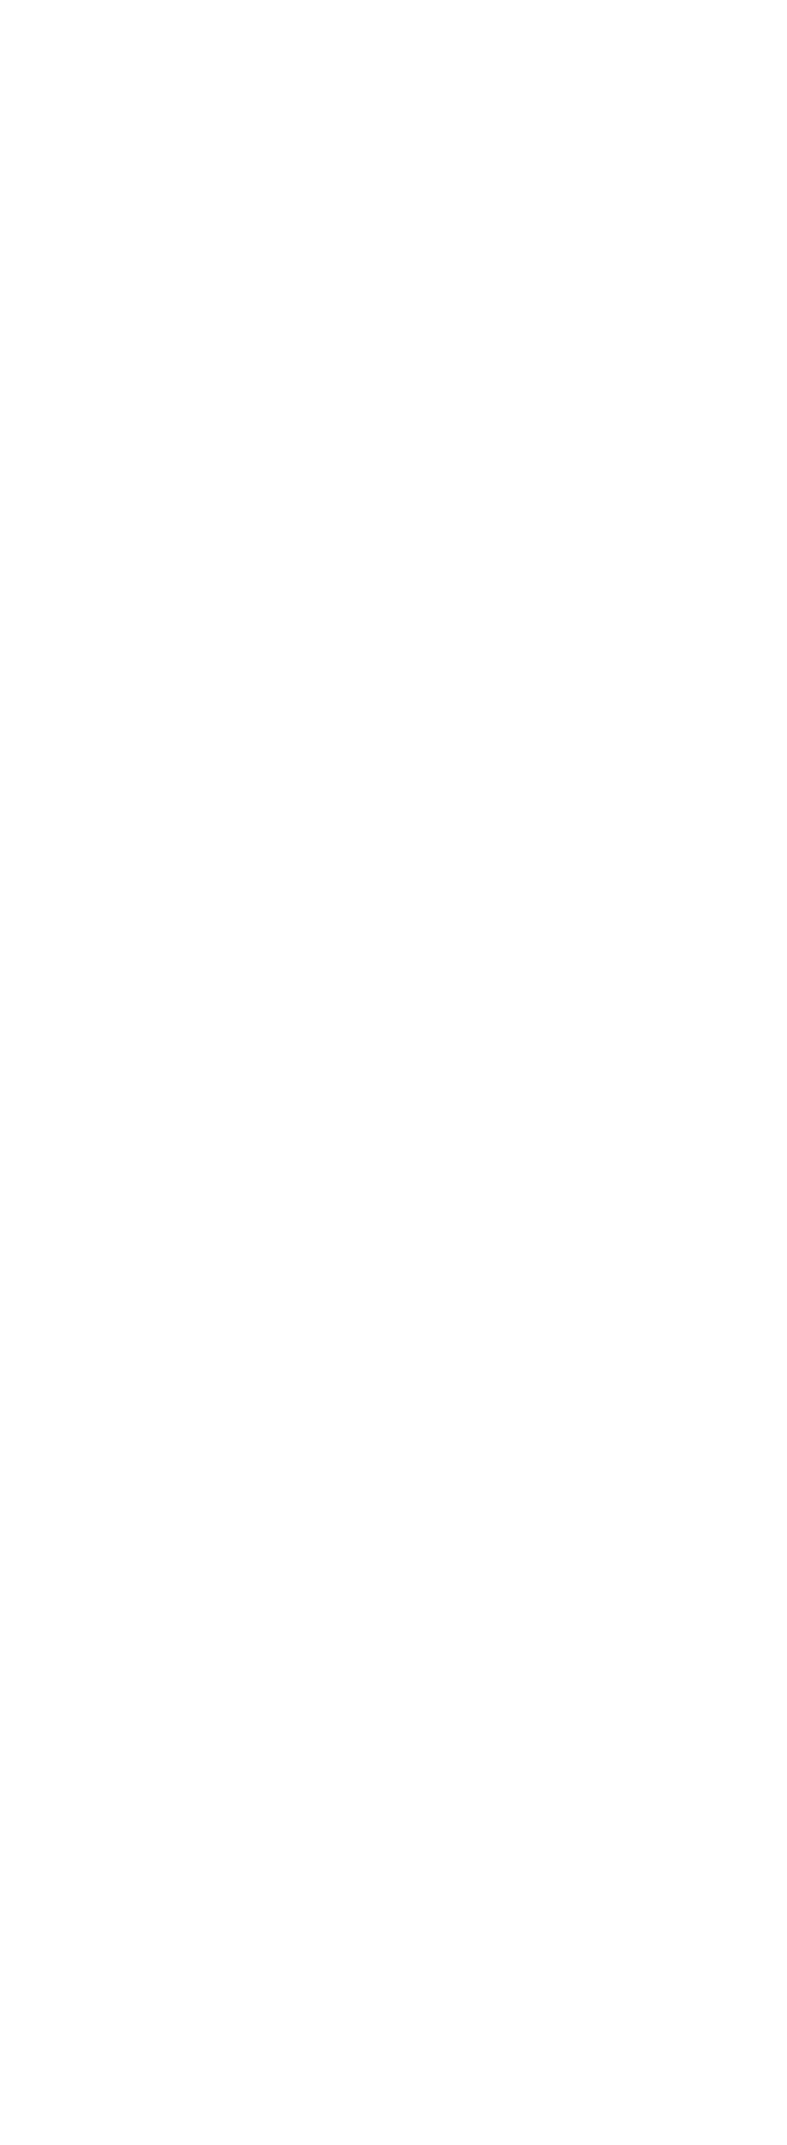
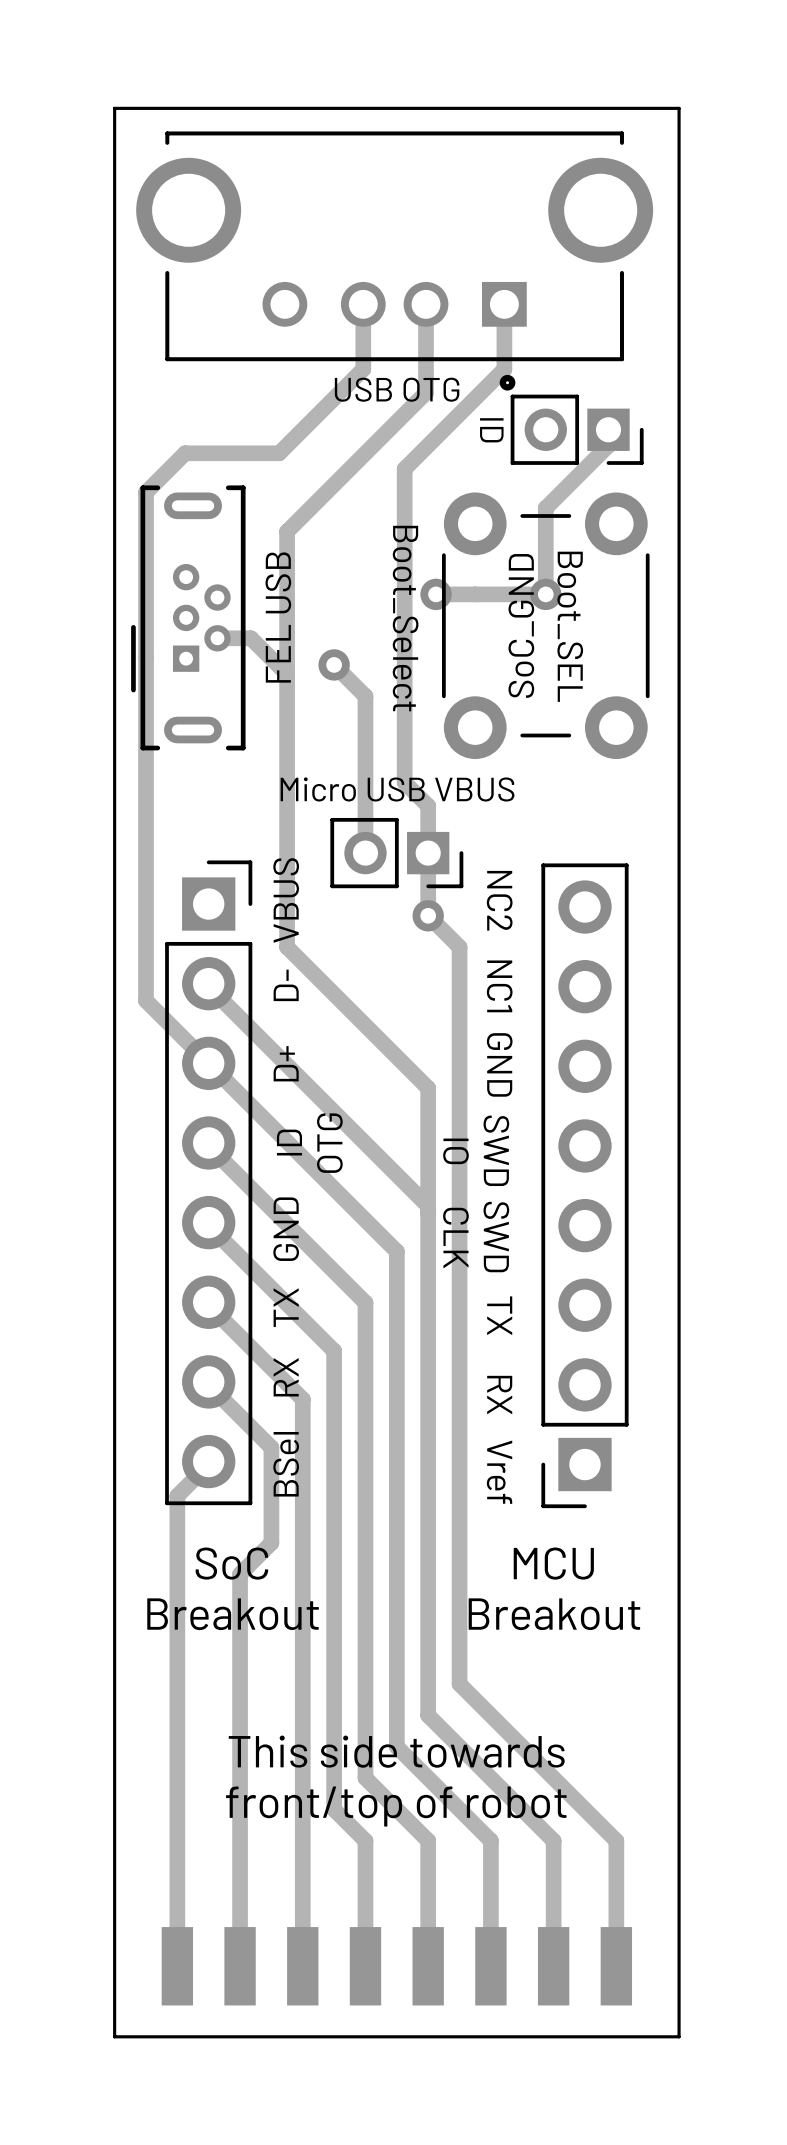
board edge: none -> (114, 108) (679, 108) (679, 2036) (114, 2036) (114, 108)
part: none -> (394, 261)
track: none -> (363, 304) (363, 369) (279, 453) (185, 453) (145, 492) (145, 1000) (396, 1251) (396, 1746) (490, 1840) (490, 1966)
track: none -> (426, 304) (426, 392) (287, 531) (287, 947) (428, 1088) (428, 1715) (553, 1840) (553, 1966)
track: none -> (504, 304) (504, 369) (404, 468) (404, 782) (428, 806) (428, 915) (459, 947) (459, 1684) (616, 1840) (616, 1966)
text: none -> USB OTG (397, 389)
part: none -> (577, 429)
track: none -> (608, 429) (608, 445) (545, 508) (545, 594) (436, 594)
text: none -> ID (491, 430)
via: none -> (436, 594)
via: none -> (545, 594)
part: none -> (188, 617)
text: none -> FEL USB (278, 617)
text: none -> Boot_Select (405, 618)
text: none -> SoC_GND (521, 625)
part: none -> (545, 625)
text: none -> Boot_SEL (570, 626)
track: none -> (217, 638) (251, 638) (287, 674)
track: none -> (334, 664) (365, 696) (365, 853)
via: none -> (334, 664)
text: none -> Micro USB VBUS (397, 789)
part: none -> (396, 853)
text: none -> VBUS (286, 900)
text: none -> NC2 (499, 900)
via: none -> (428, 915)
text: none -> D- (286, 985)
track: none -> (208, 986) (428, 1206)
text: none -> NC1 (499, 986)
text: none -> D+ (286, 1063)
text: none -> GND (499, 1064)
text: none -> ID (289, 1142)
text: none -> OTG (329, 1143)
track: none -> (208, 1145) (365, 1302) (365, 1778) (428, 1840) (428, 1966)
text: none -> SWD (496, 1150)
text: none -> IO (455, 1151)
part: none -> (208, 1182)
part: none -> (584, 1185)
track: none -> (208, 1225) (334, 1351) (334, 1809) (365, 1840) (365, 1966)
text: none -> GND (286, 1229)
text: none -> SWD (496, 1237)
text: none -> CLK (455, 1238)
track: none -> (208, 1305) (302, 1399) (302, 1966)
text: none -> TX (286, 1307)
text: none -> TX (499, 1315)
text: none -> RX (286, 1377)
track: none -> (208, 1384) (271, 1447) (271, 1542) (240, 1574) (240, 1966)
text: none -> RX (499, 1394)
track: none -> (208, 1464) (177, 1495) (177, 1966)
text: none -> BSel (286, 1464)
text: none -> Vref (499, 1472)
text: none -> SoC (231, 1563)
text: none -> MCU (553, 1563)
text: none -> Breakout (233, 1614)
text: none -> Breakout (554, 1614)
text: none -> This side towards (396, 1751)
text: none -> front/top of robot (396, 1806)
part: none -> (396, 1966)

